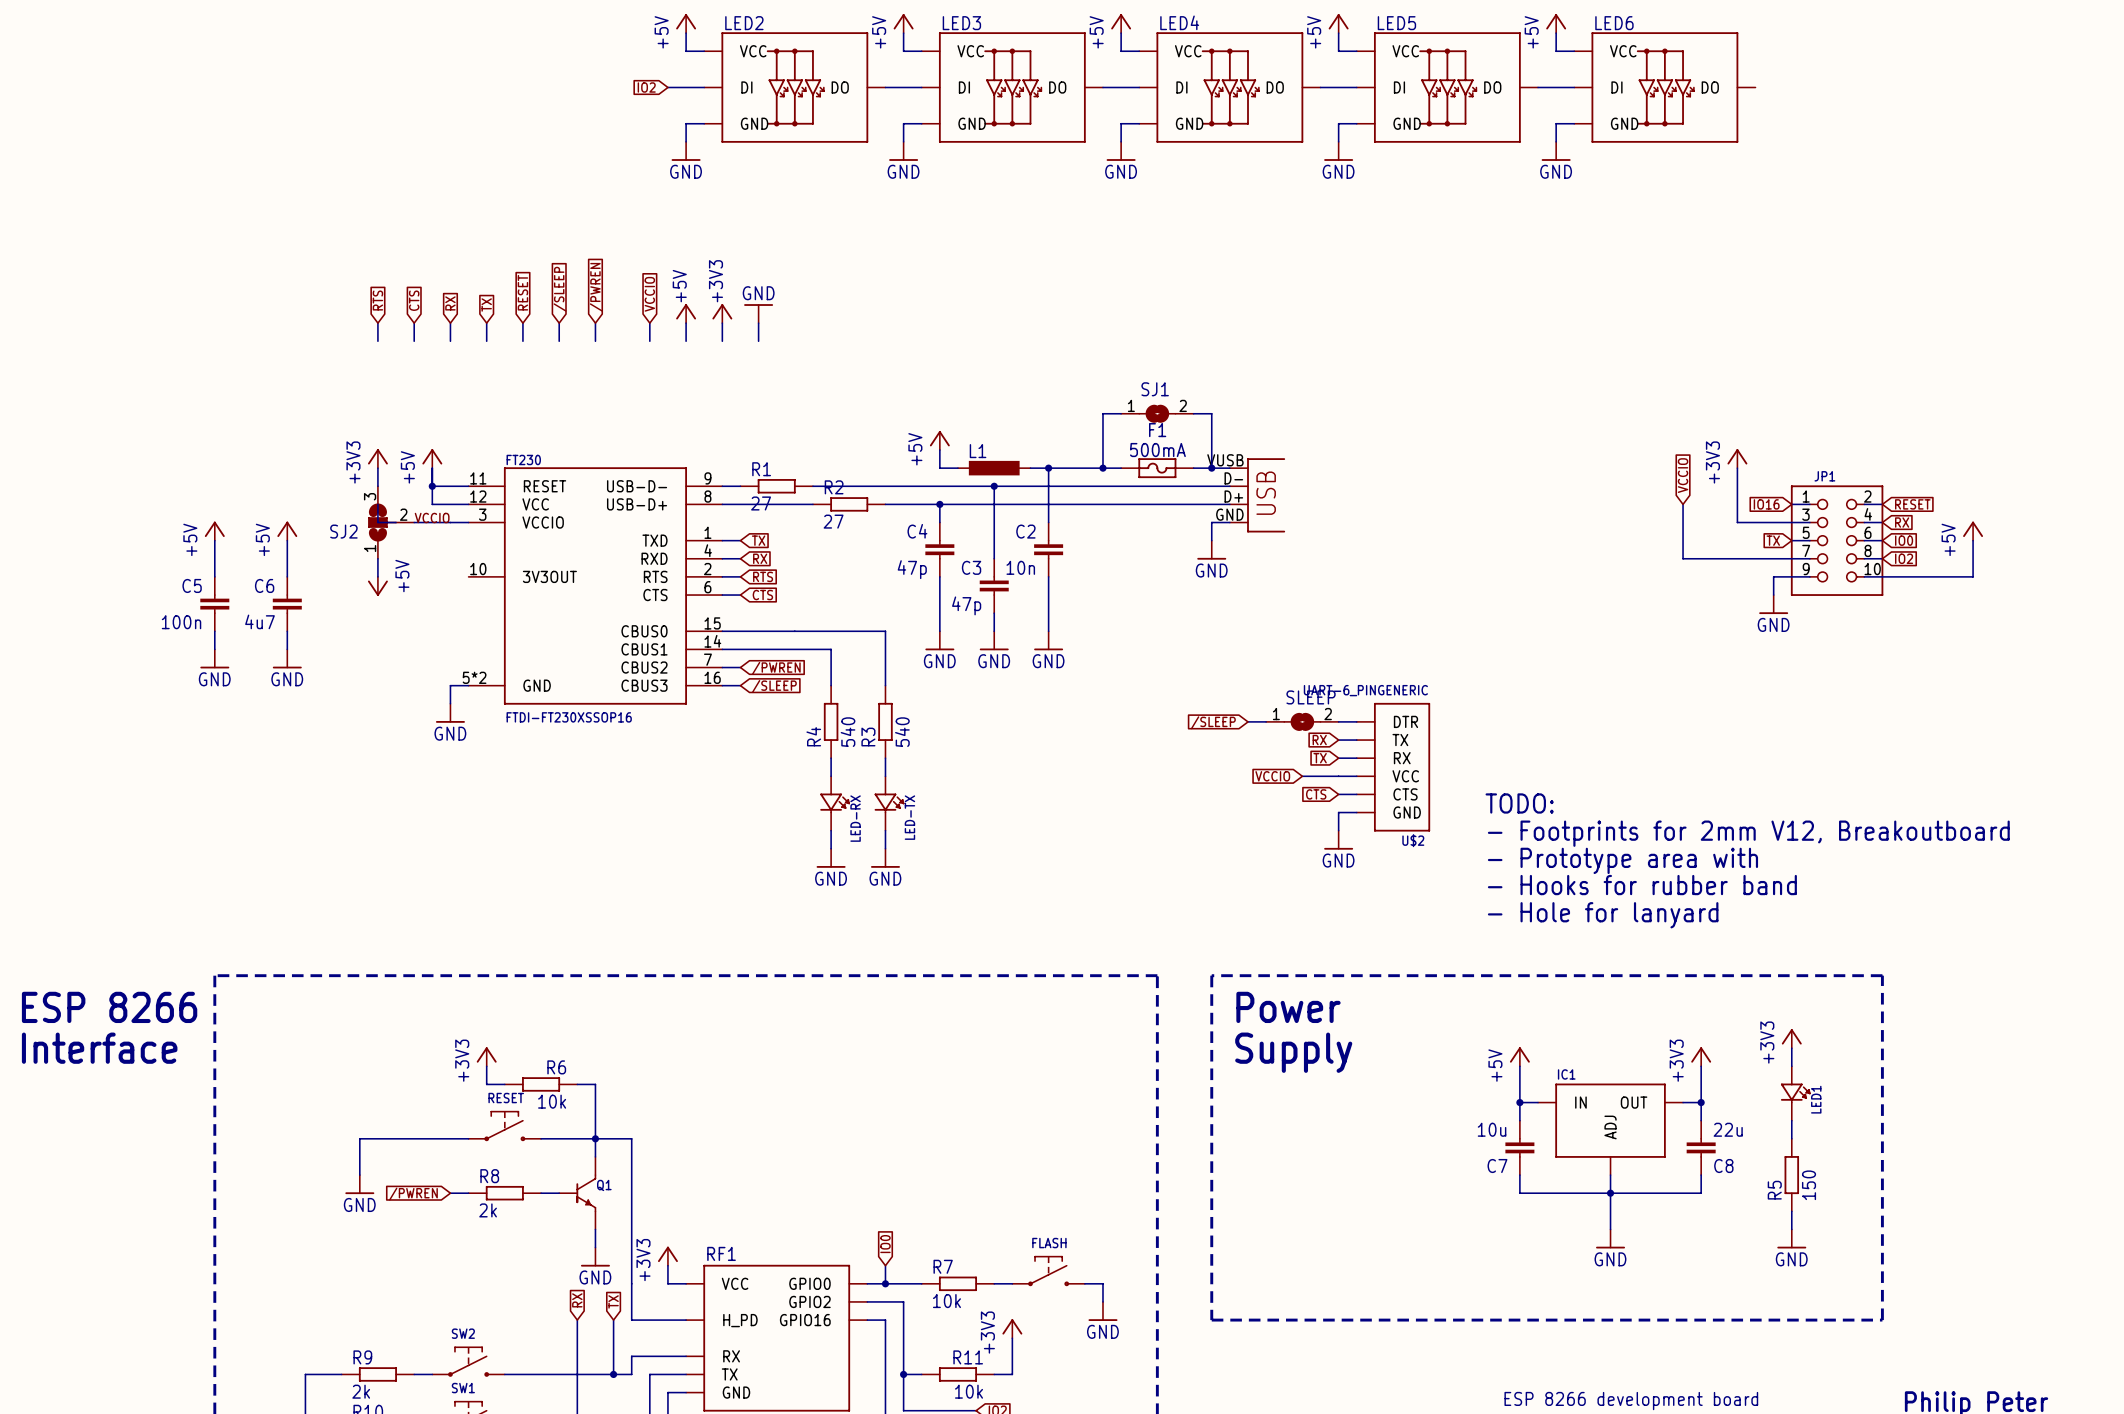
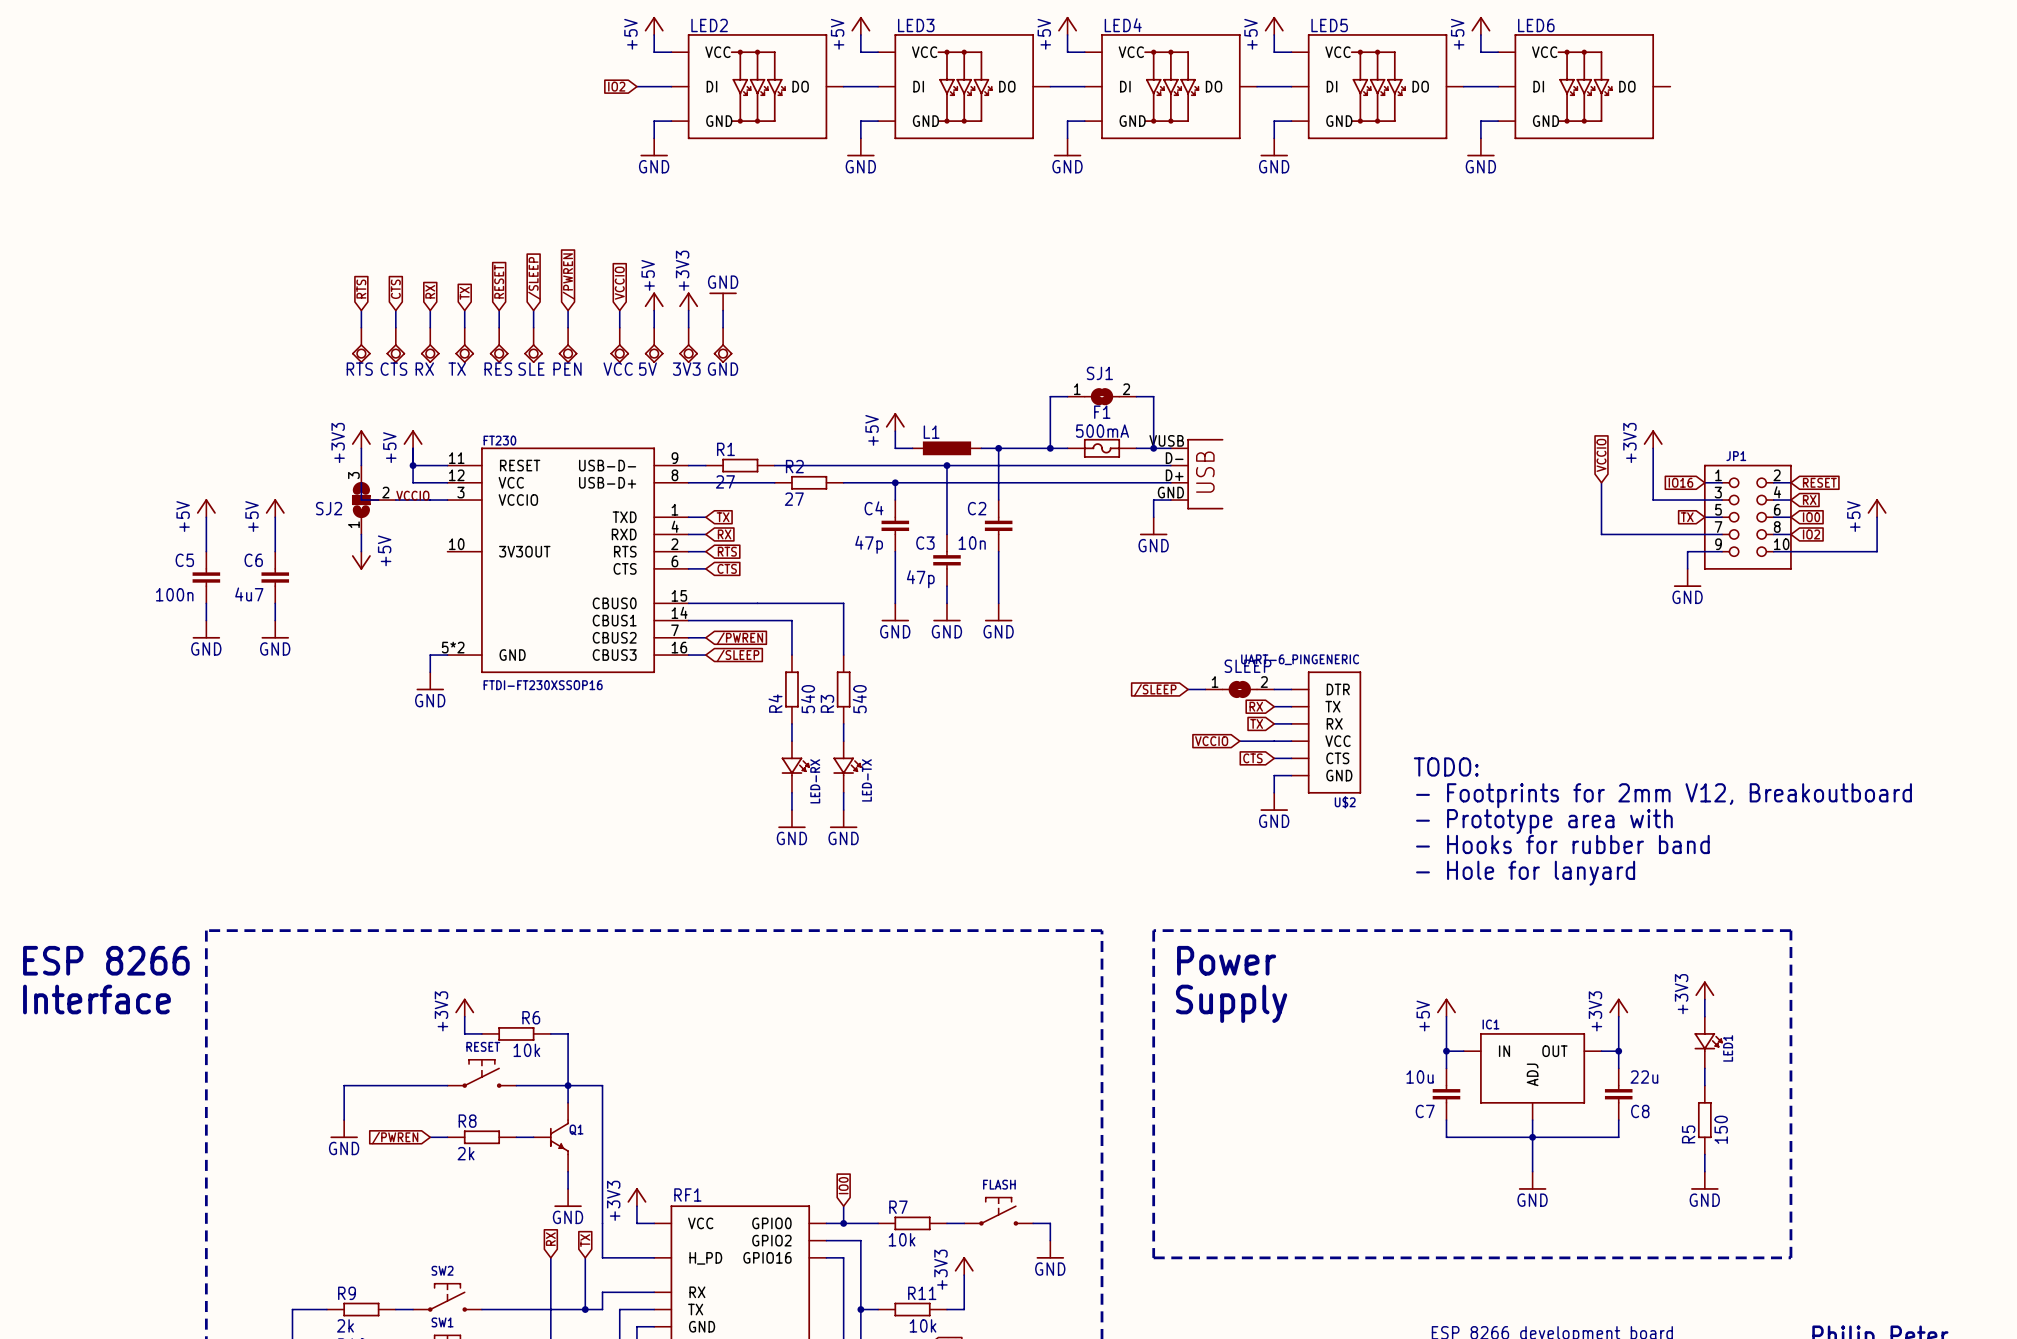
RTS: none -> (361, 345)
CTS: none -> (395, 345)
RX: none -> (430, 345)
TX: none -> (464, 345)
RES: none -> (499, 345)
SLE: none -> (533, 345)
PEN: none -> (568, 345)
VCC: none -> (619, 345)
5V: none -> (654, 345)
3V3: none -> (688, 345)
GND: none -> (723, 345)

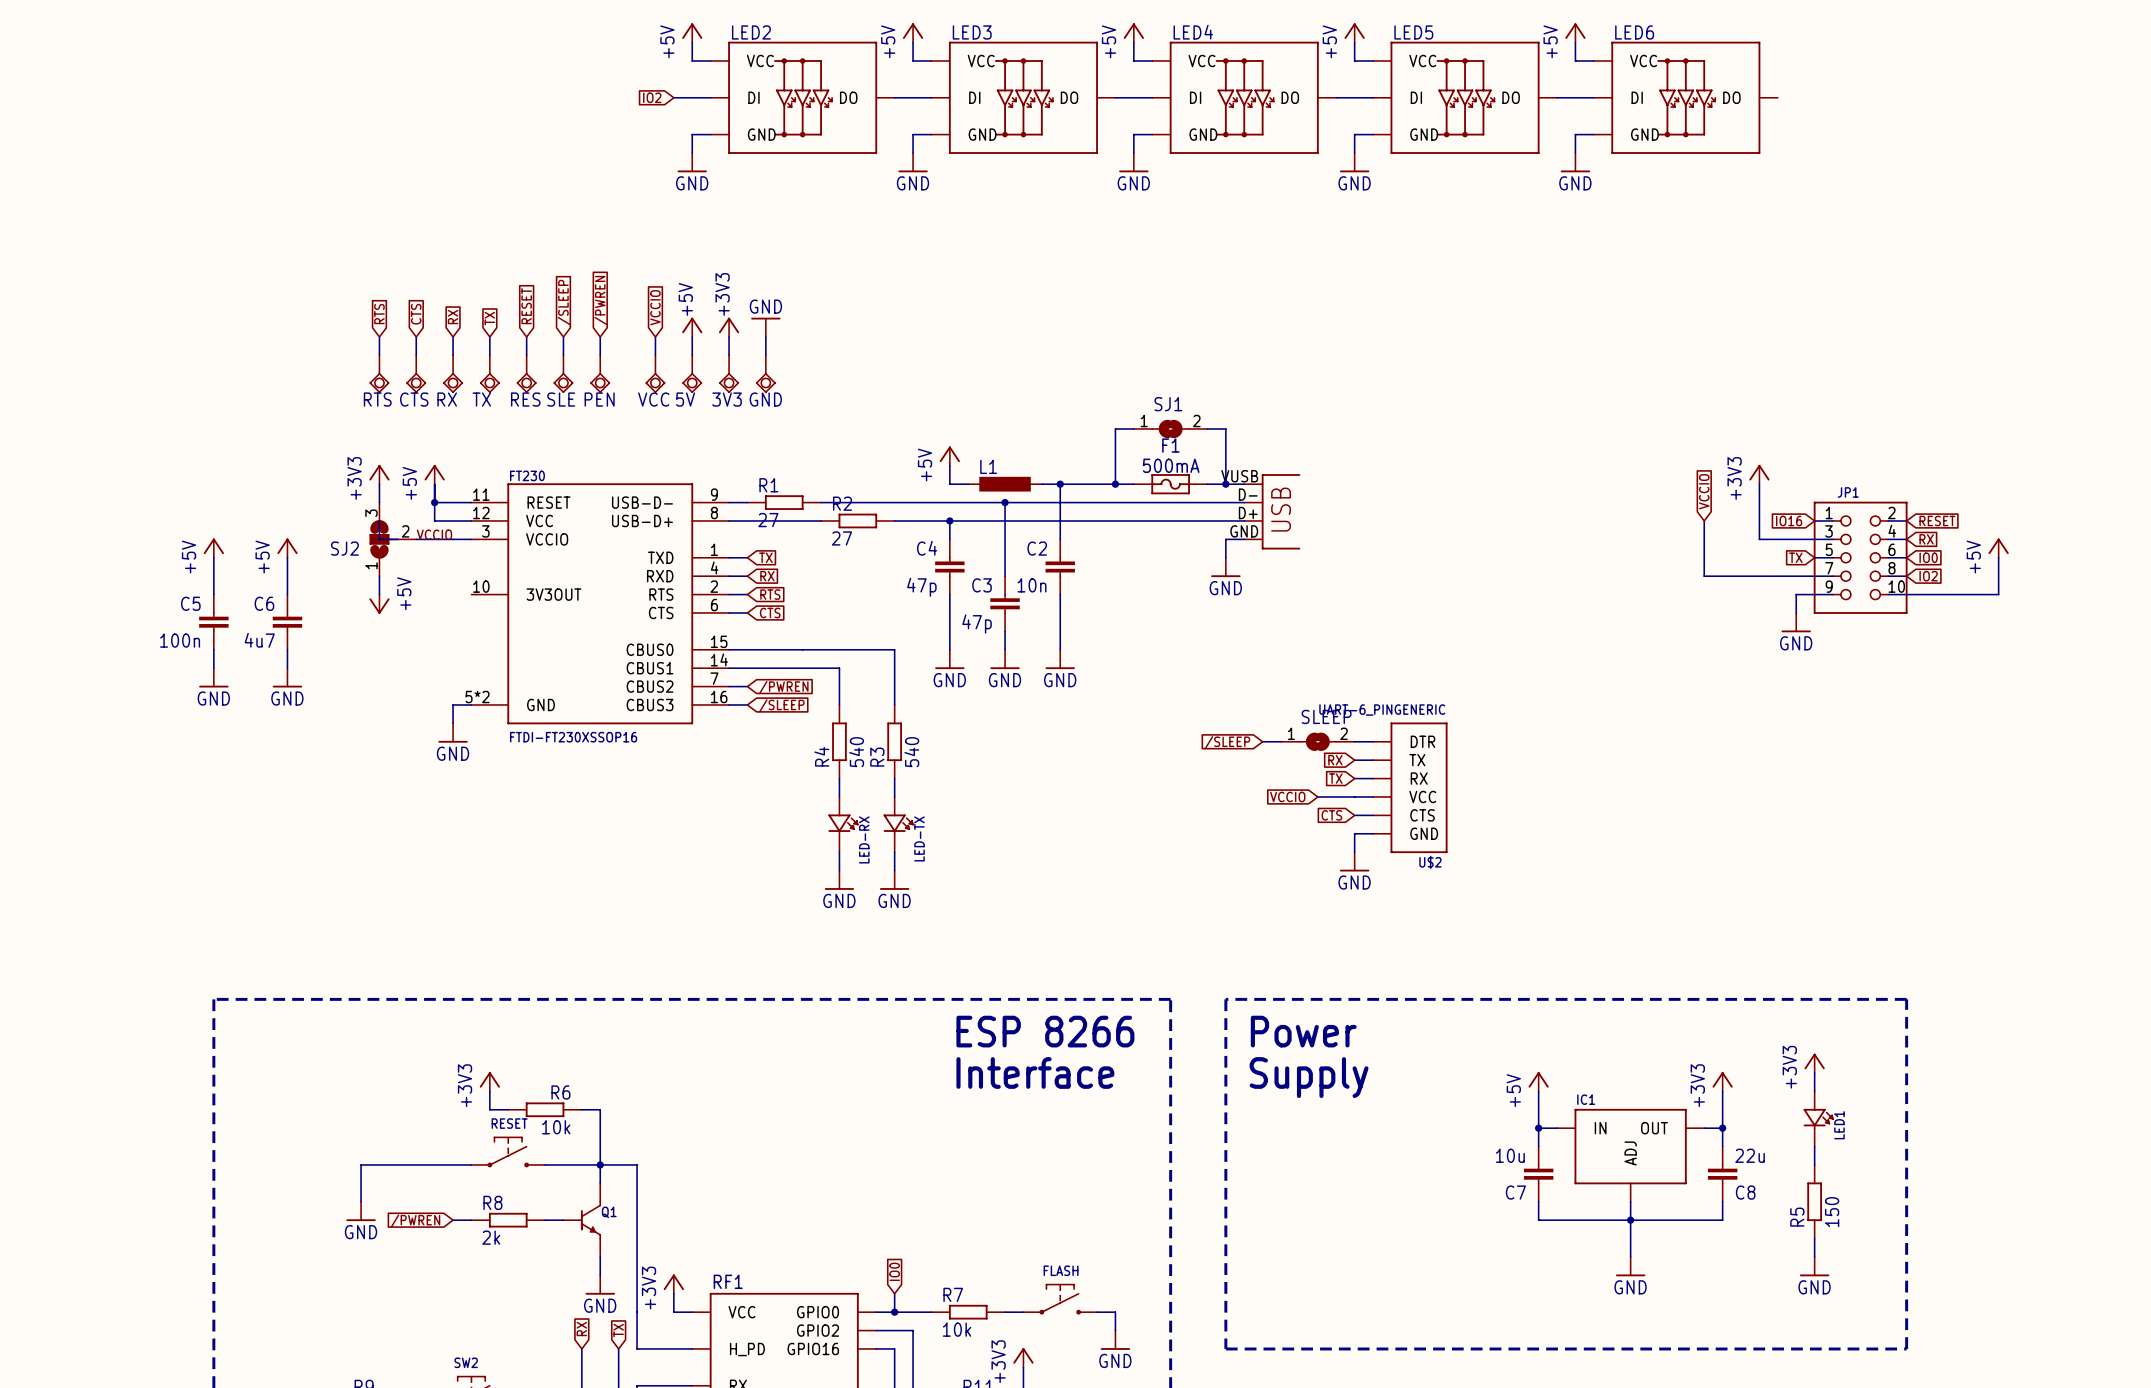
text: TODO: (1446, 766) -> none
text: - Footprints for 2mm V12, Breakoutboard (1664, 795) -> none
text: - Prototype area with (1544, 821) -> none
text: - Hooks for rubber band (1562, 844) -> none
text: - Hole for lanyard (1525, 873) -> none
text: ESP 8266 (106, 960) -> none
text: none -> ESP 8266 (1045, 1031)
text: Interface (96, 999) -> none
text: none -> Interface (1035, 1072)

